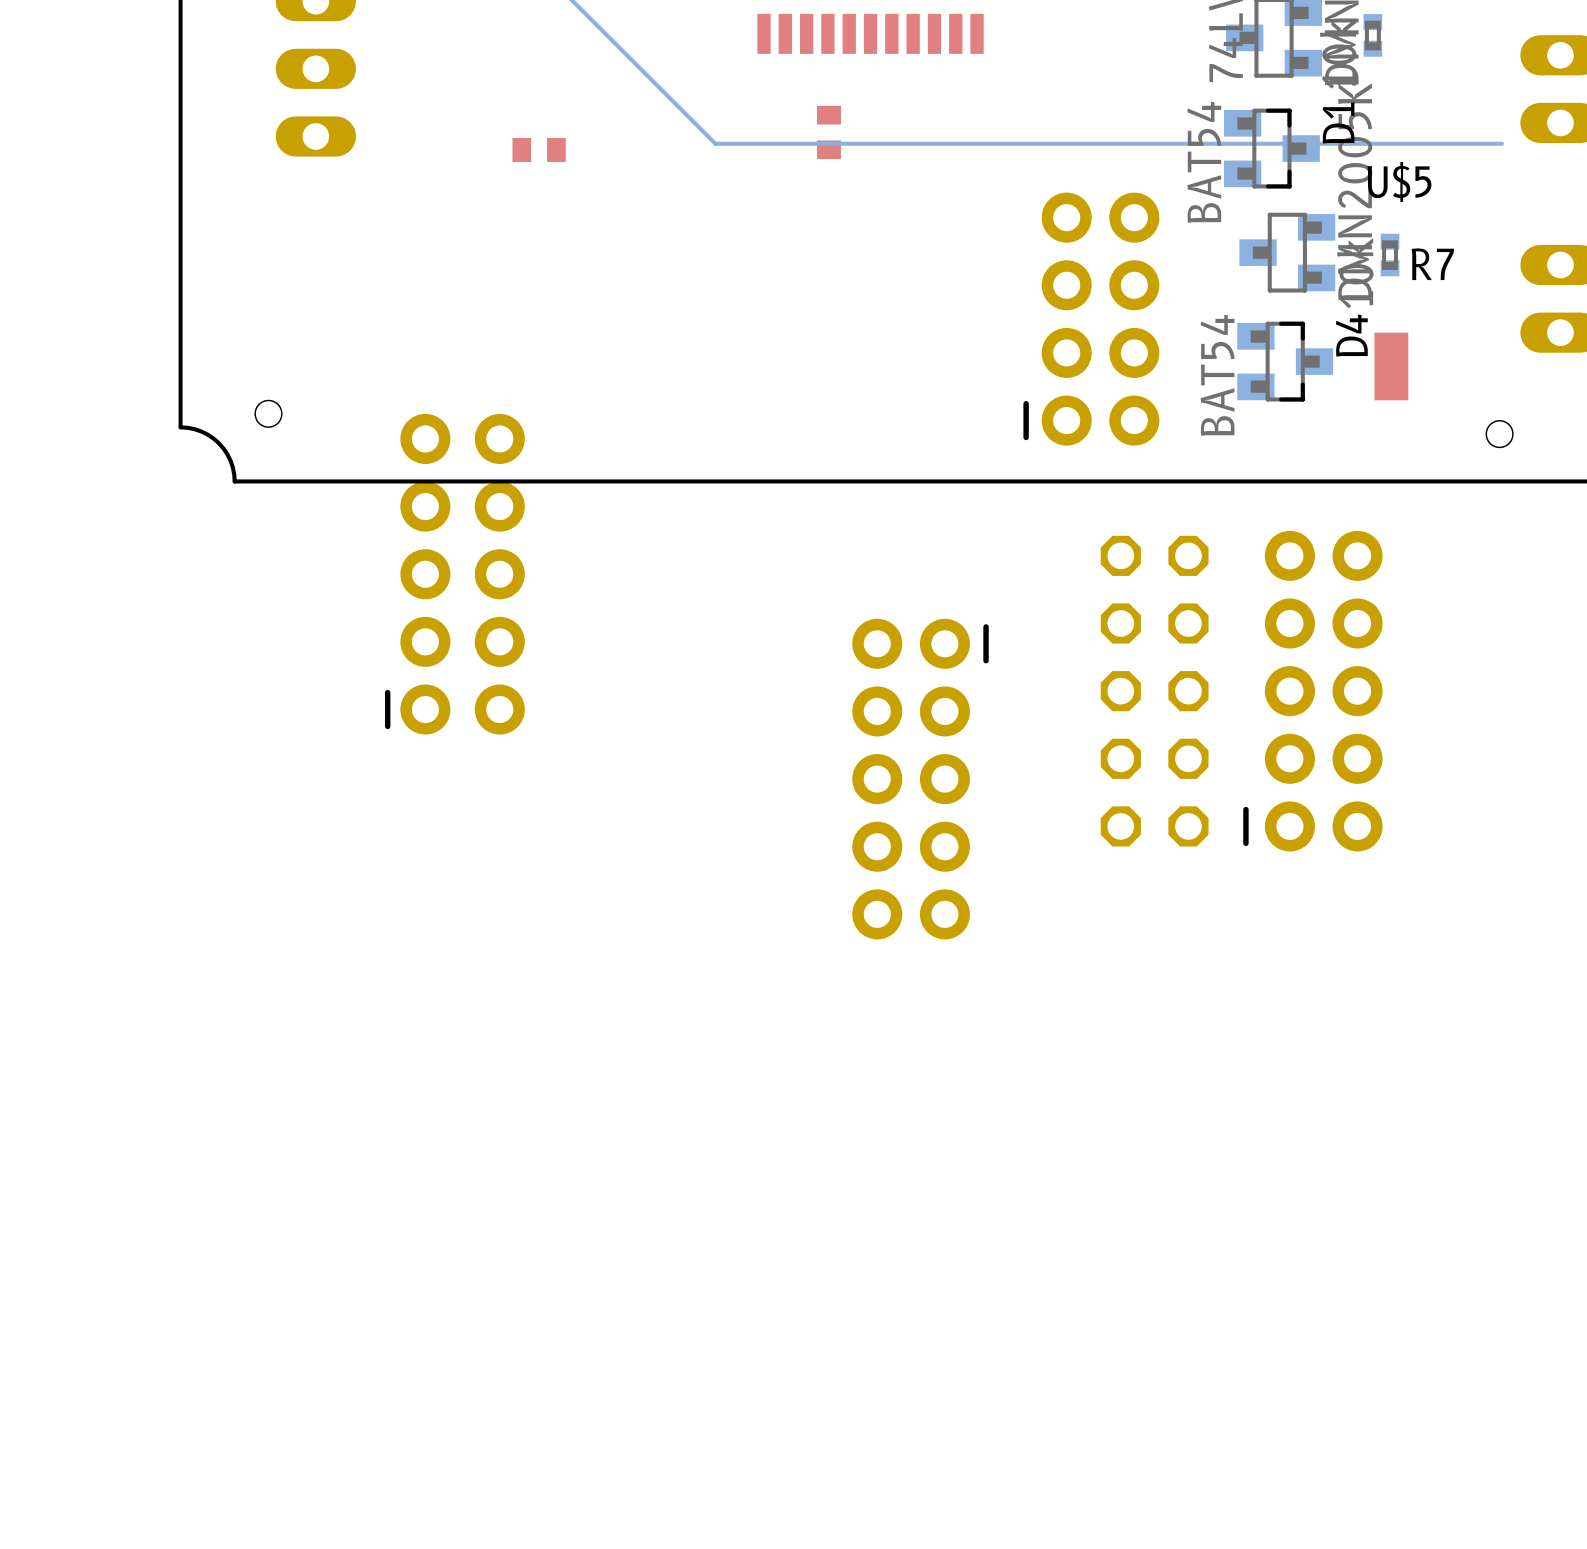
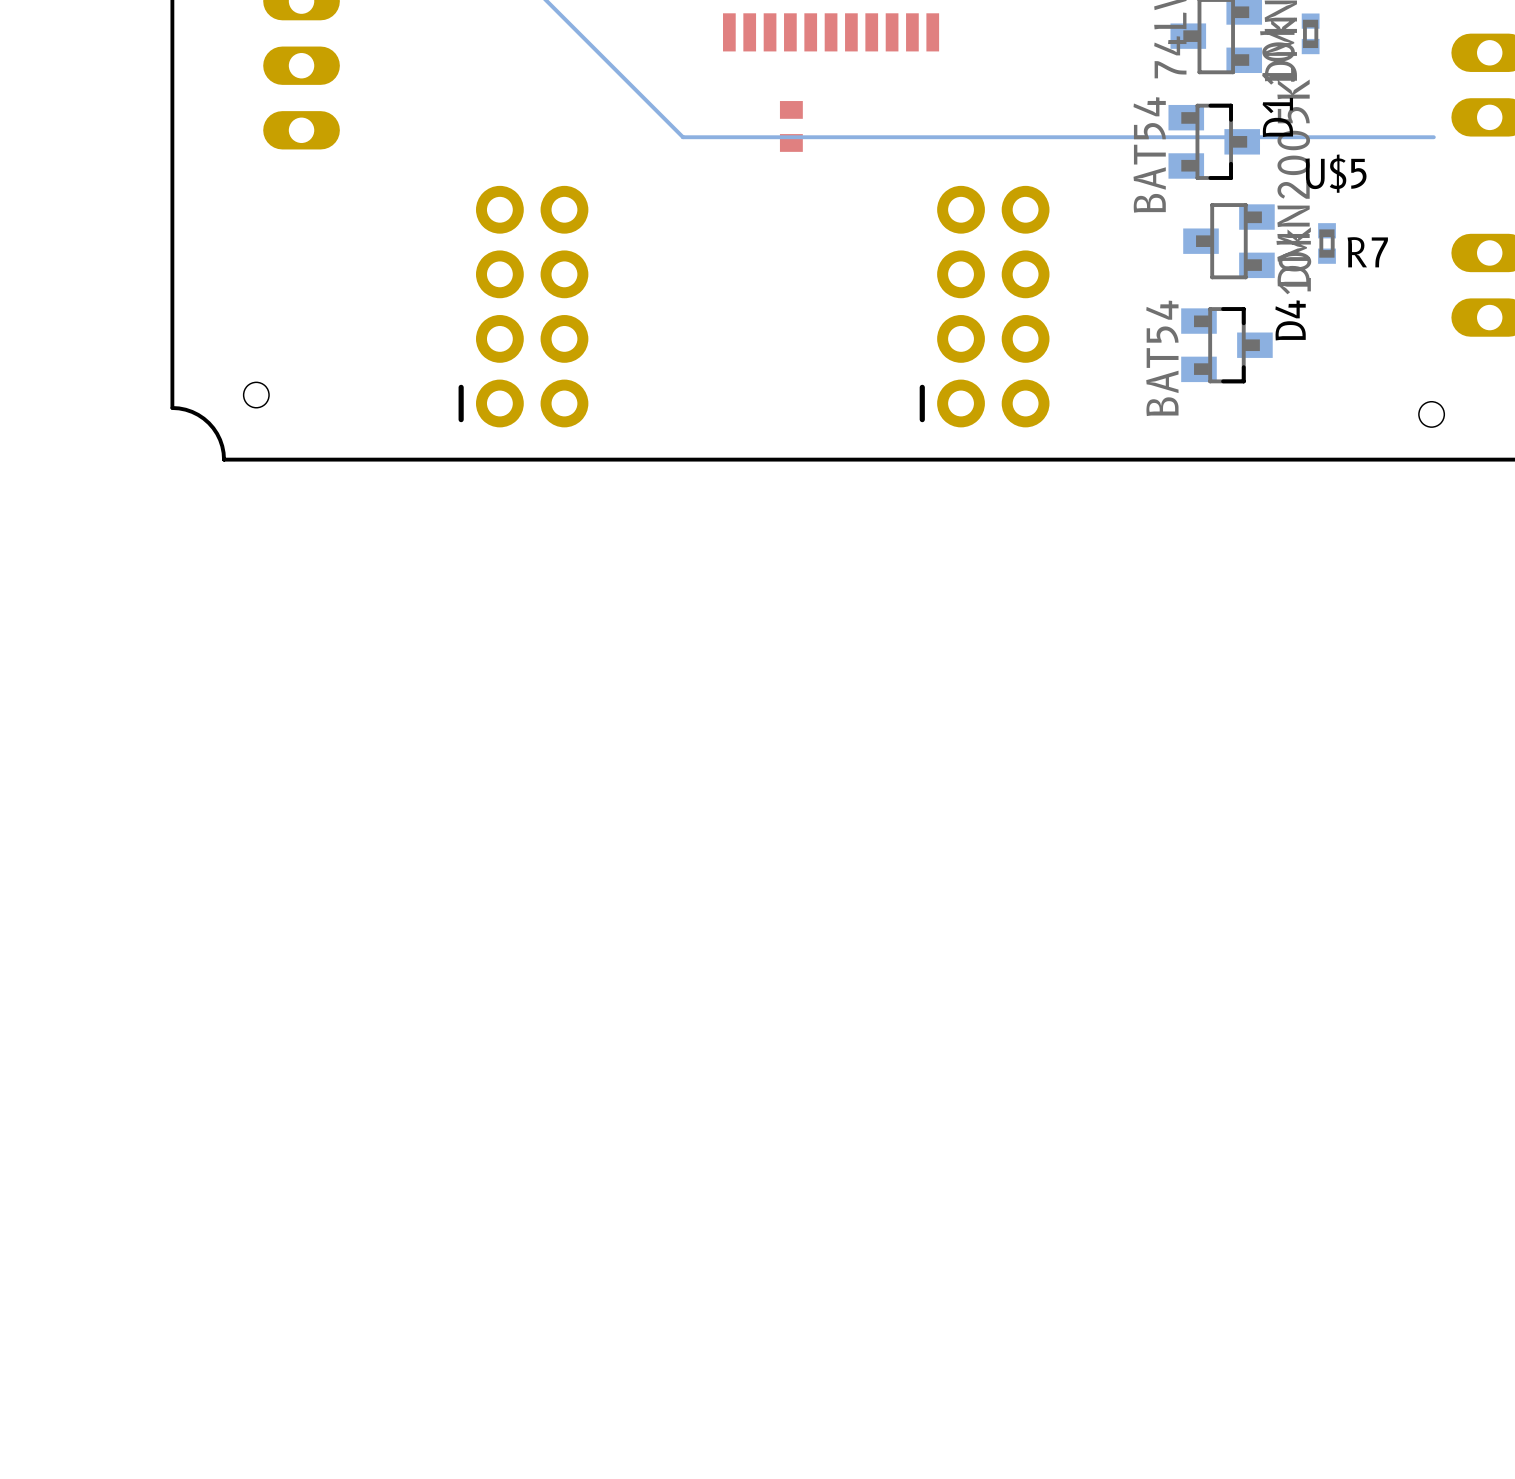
part: (539, 150) -> none
part position: (1091, 319) -> (984, 306)
part: none -> (523, 306)
part: (1391, 366) -> none
part: (454, 574) -> none
part: (1154, 691) -> none
part: (1312, 691) -> none
part: (920, 779) -> none

